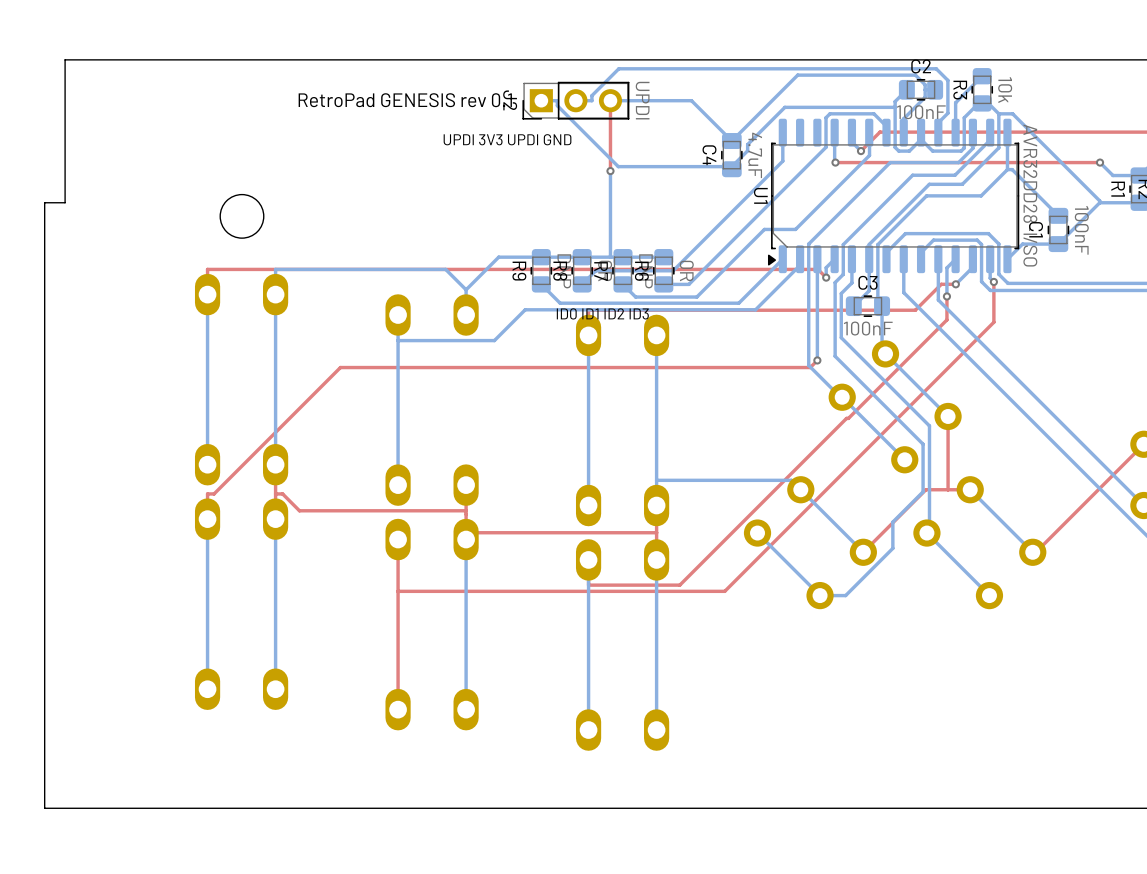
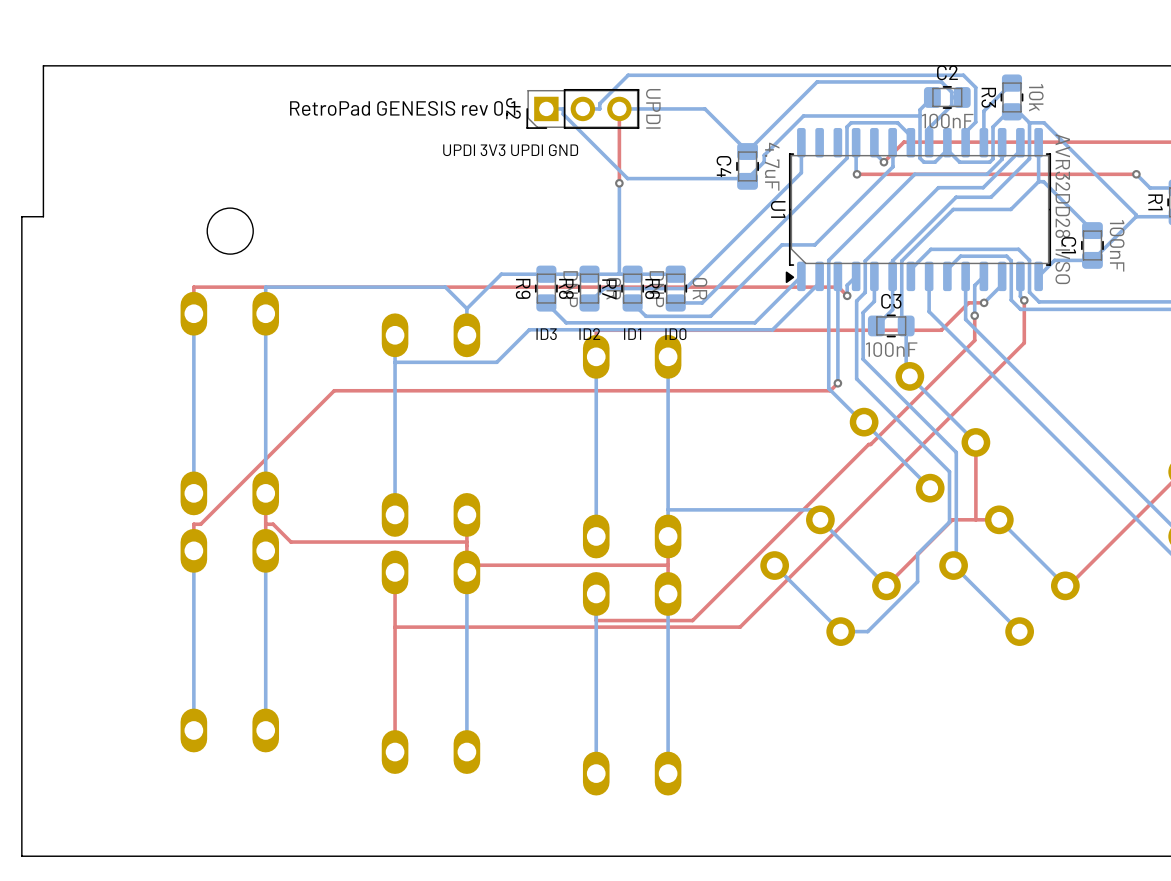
text: none -> ID3 (546, 334)
text: none -> ID2 (589, 334)
text: ID0 ID1 ID2 ID3 (602, 313) -> none
text: none -> ID1 (632, 334)
text: none -> ID0 (675, 334)

